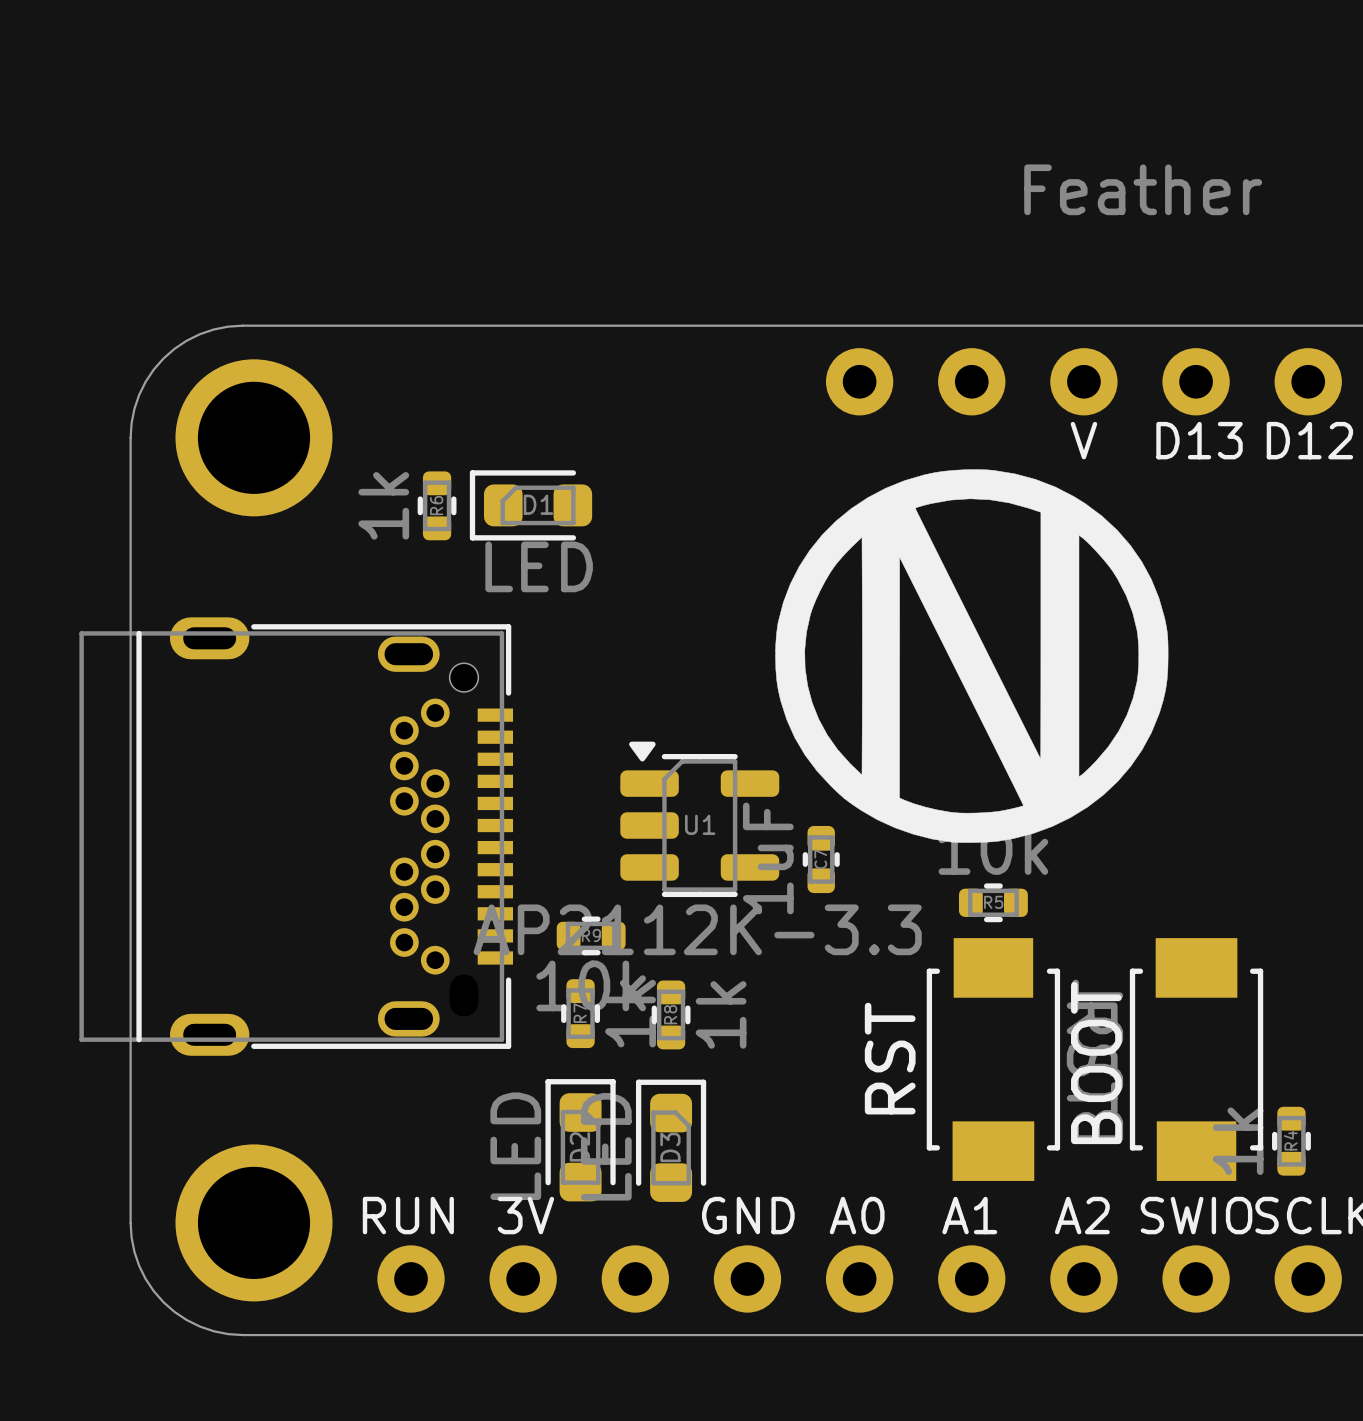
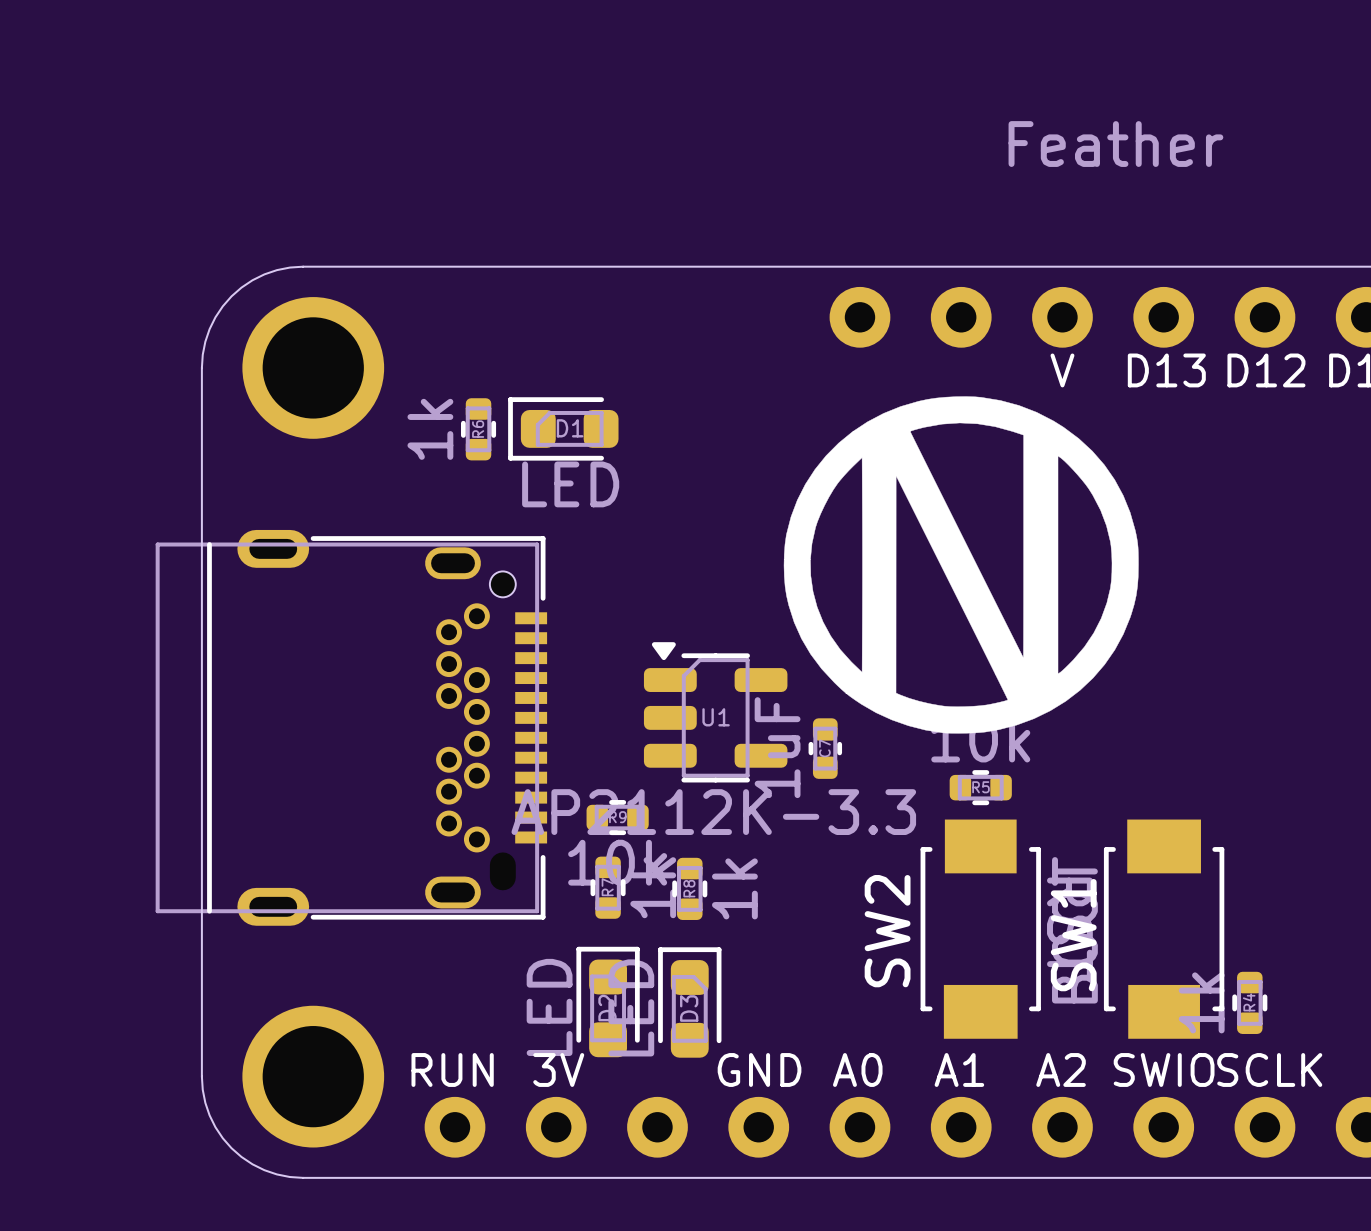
RST name: RST (890, 1058) -> SW2 (887, 931)
BOOT name: BOOT (1096, 1063) -> SW1 (1073, 935)

